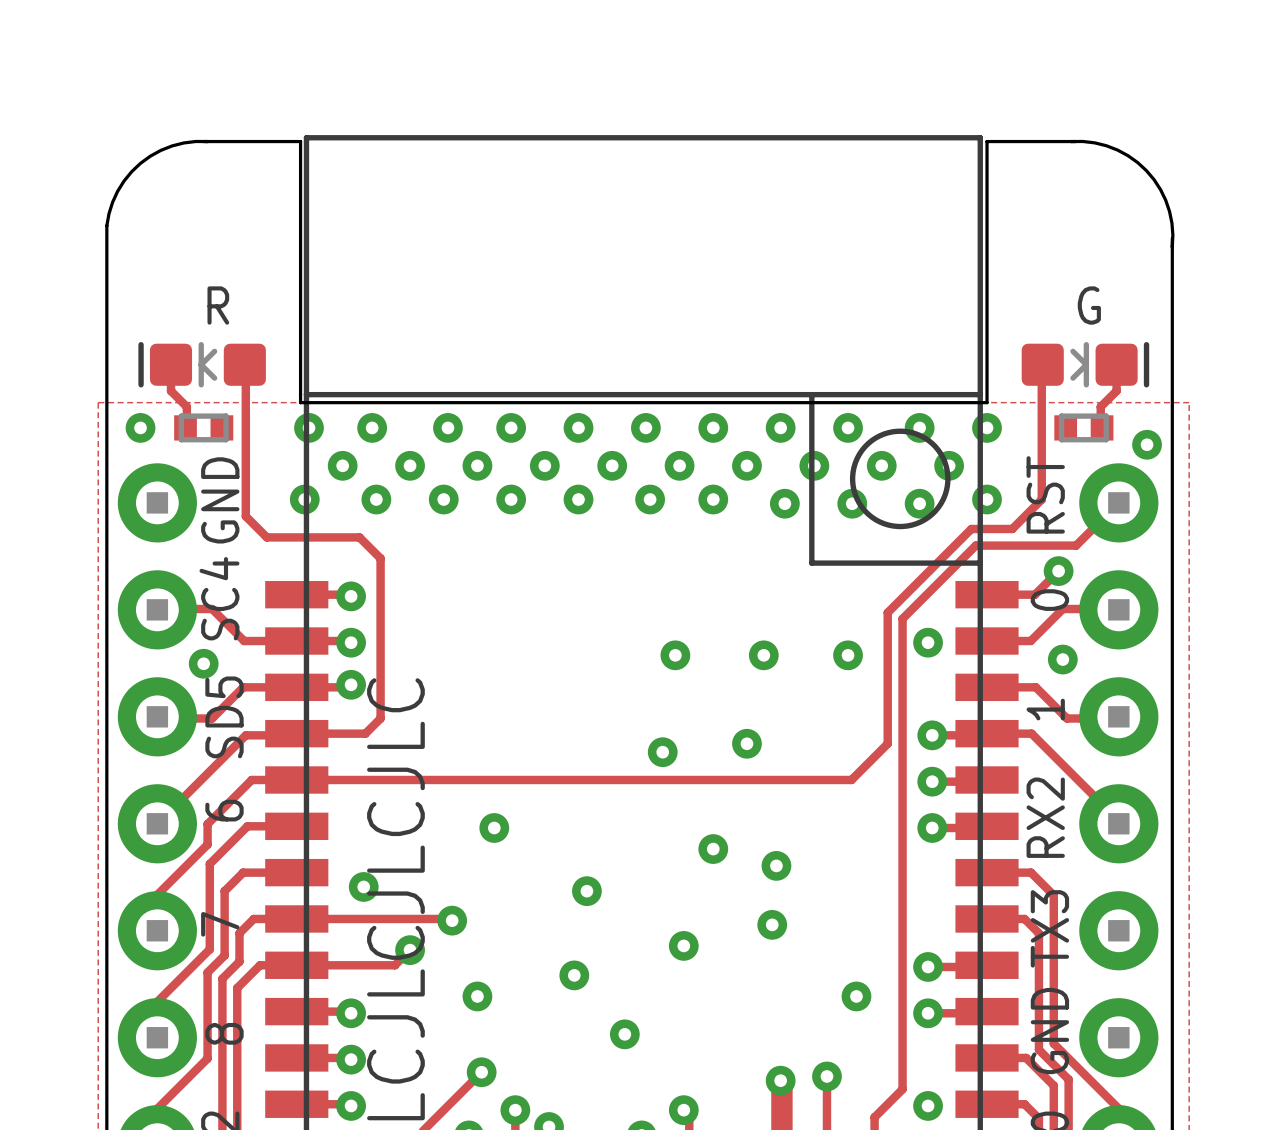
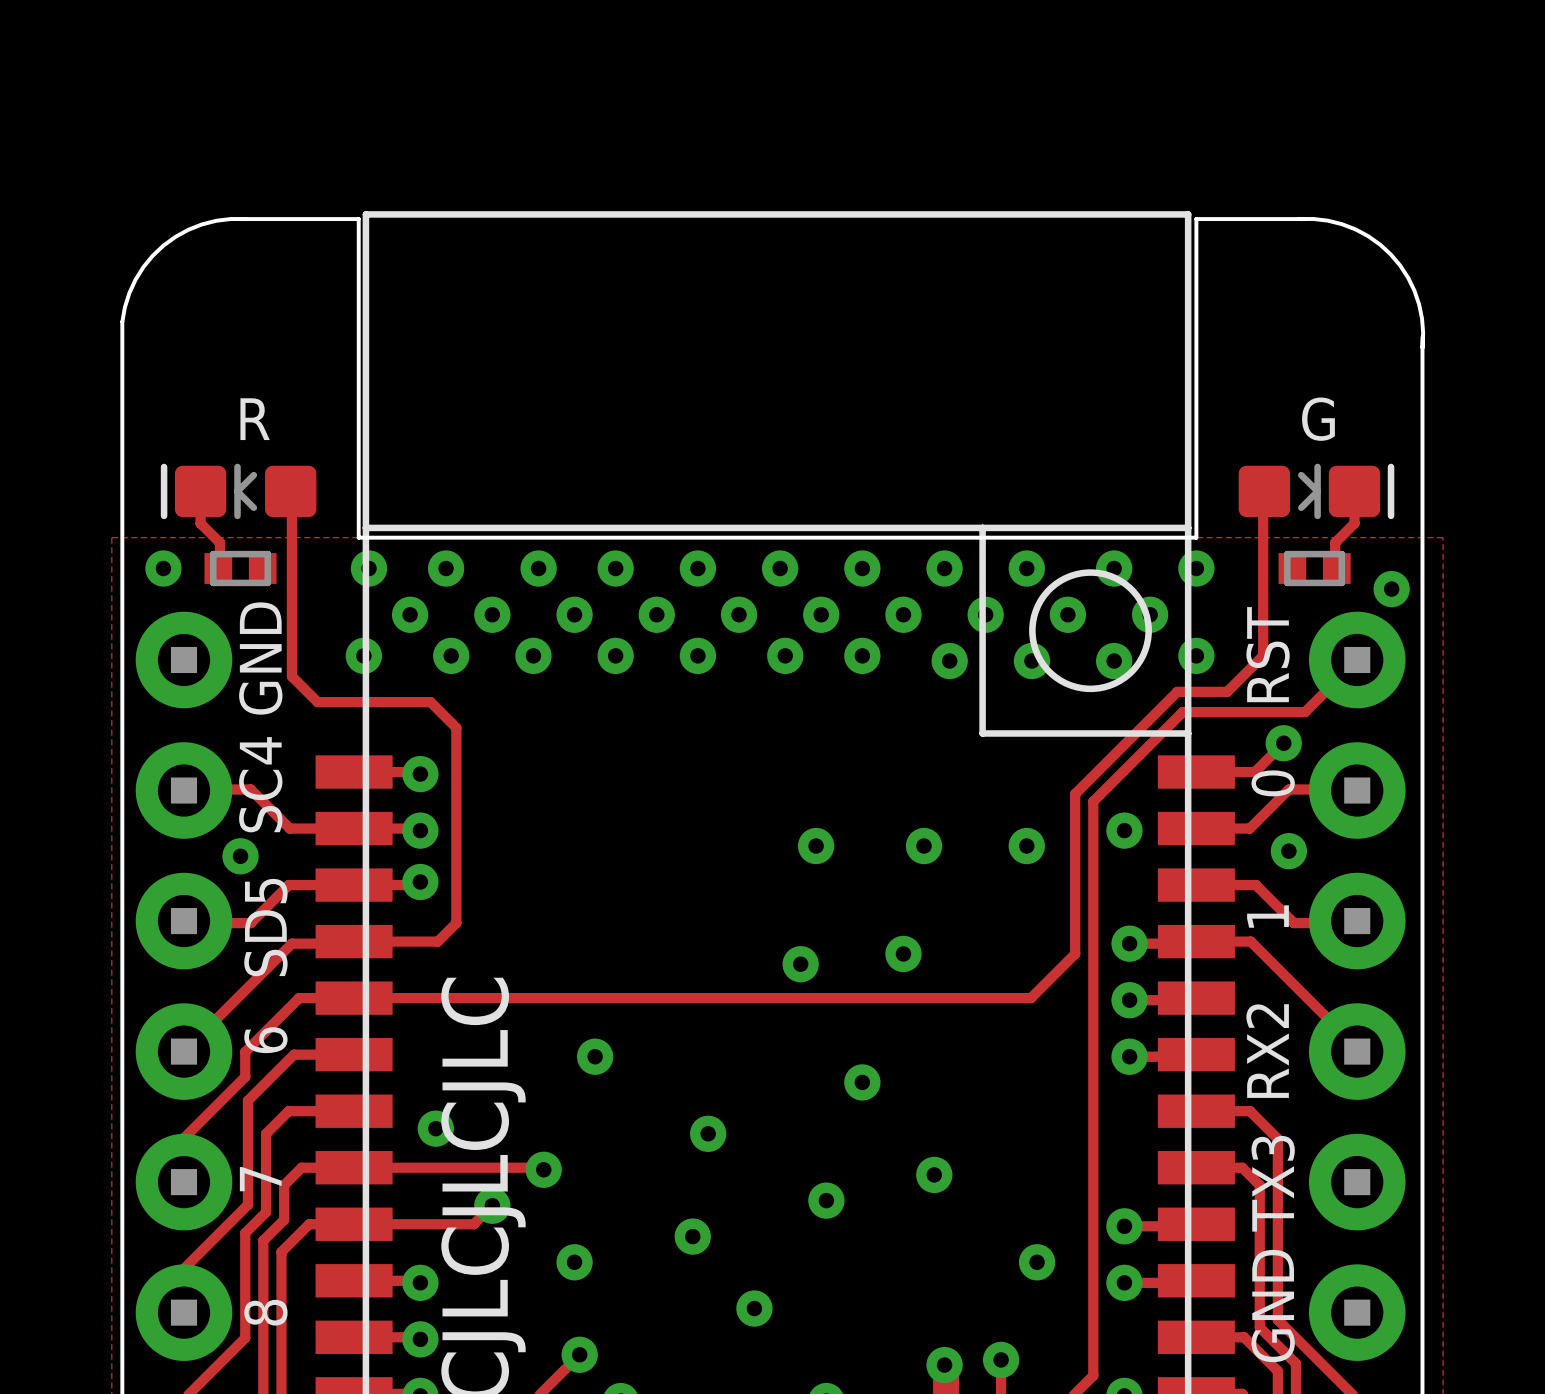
via: (776, 865) -> none

